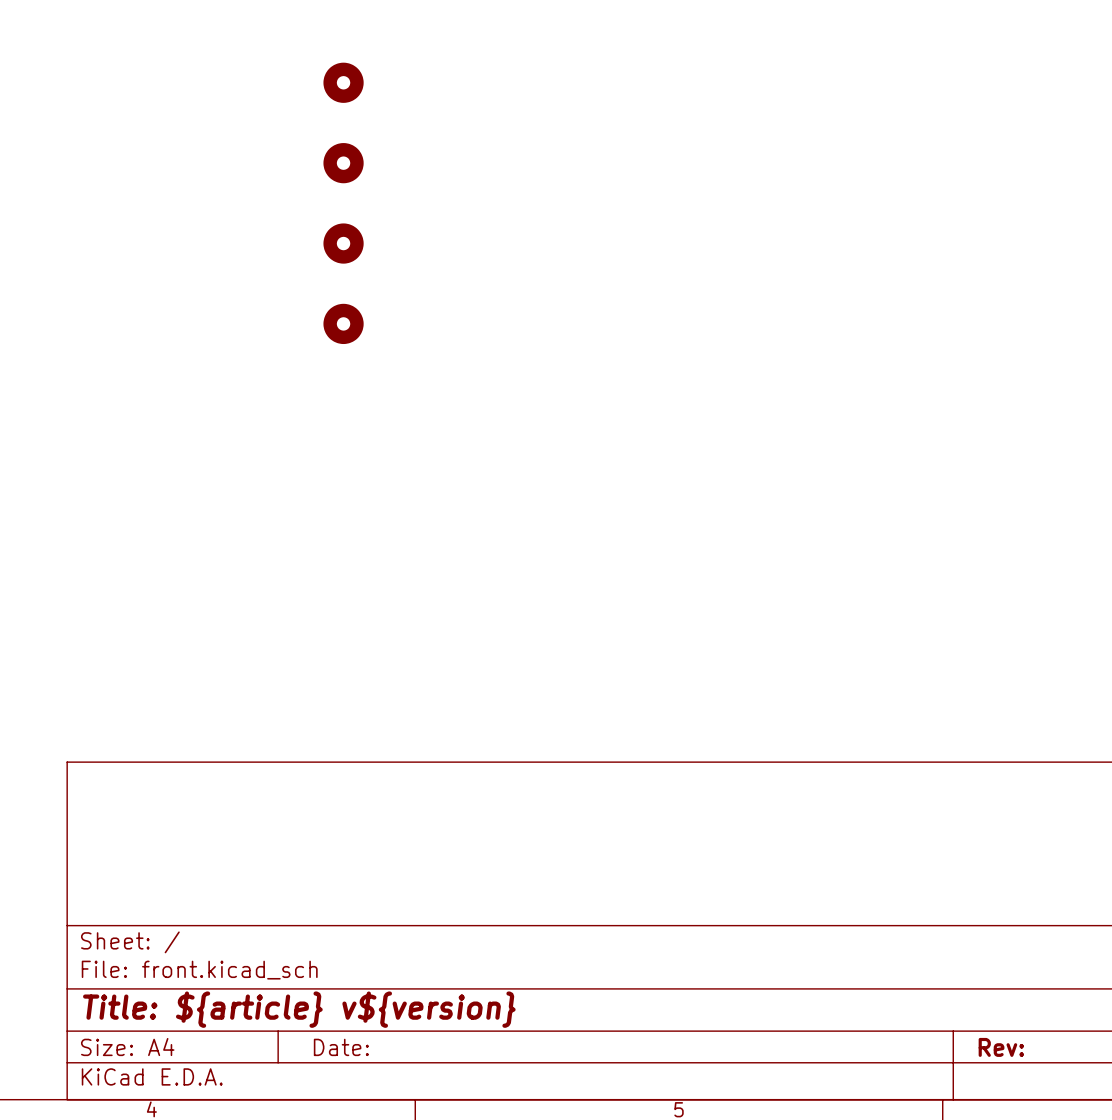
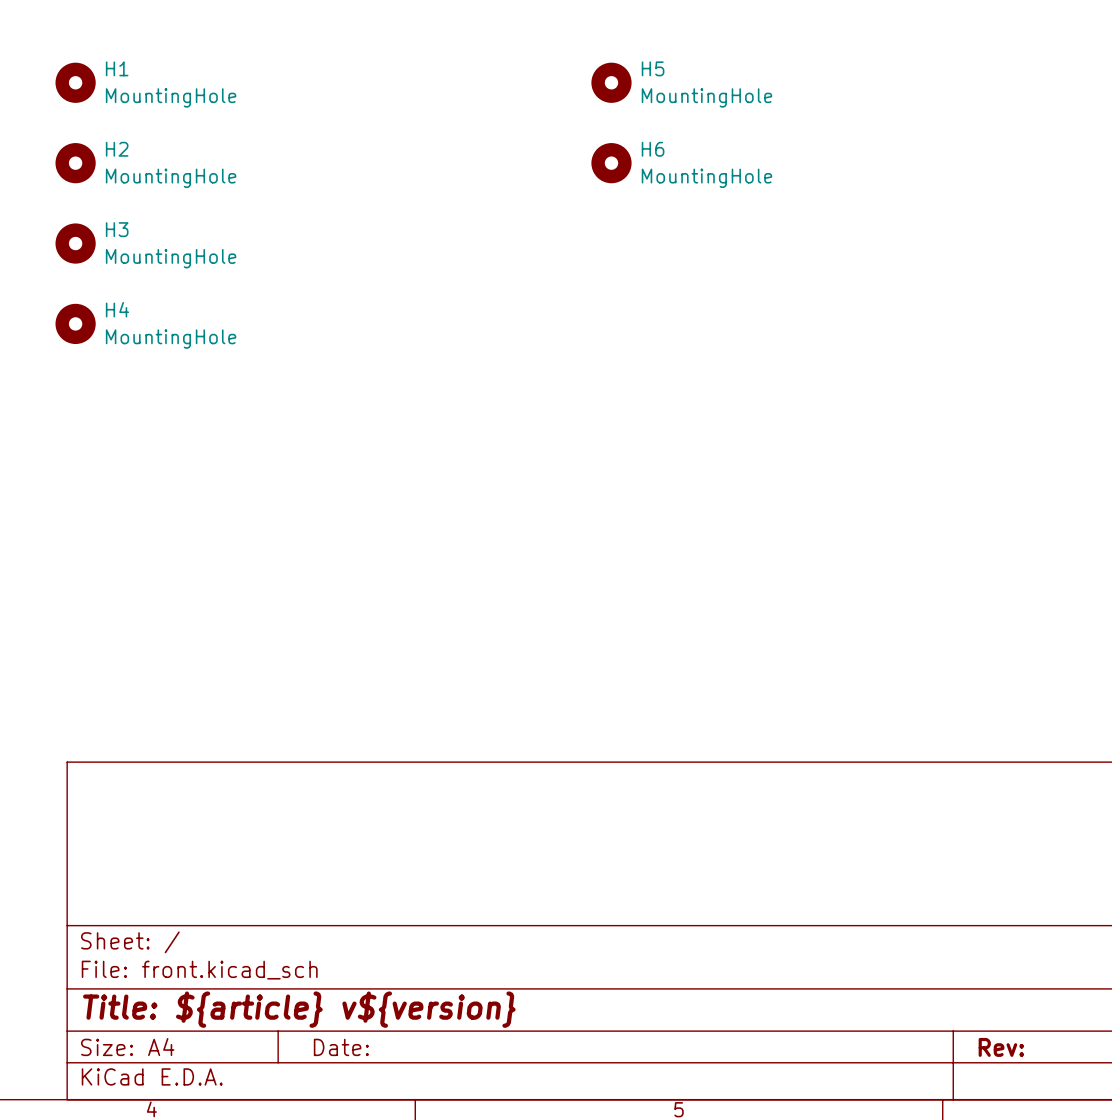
H1: none -> MountingHole (75, 82)
part: (343, 82) -> none
H5: none -> MountingHole (611, 82)
H2: none -> MountingHole (75, 163)
part: (343, 163) -> none
H6: none -> MountingHole (611, 163)
H3: none -> MountingHole (75, 243)
part: (343, 243) -> none
H4: none -> MountingHole (75, 323)
part: (343, 323) -> none

